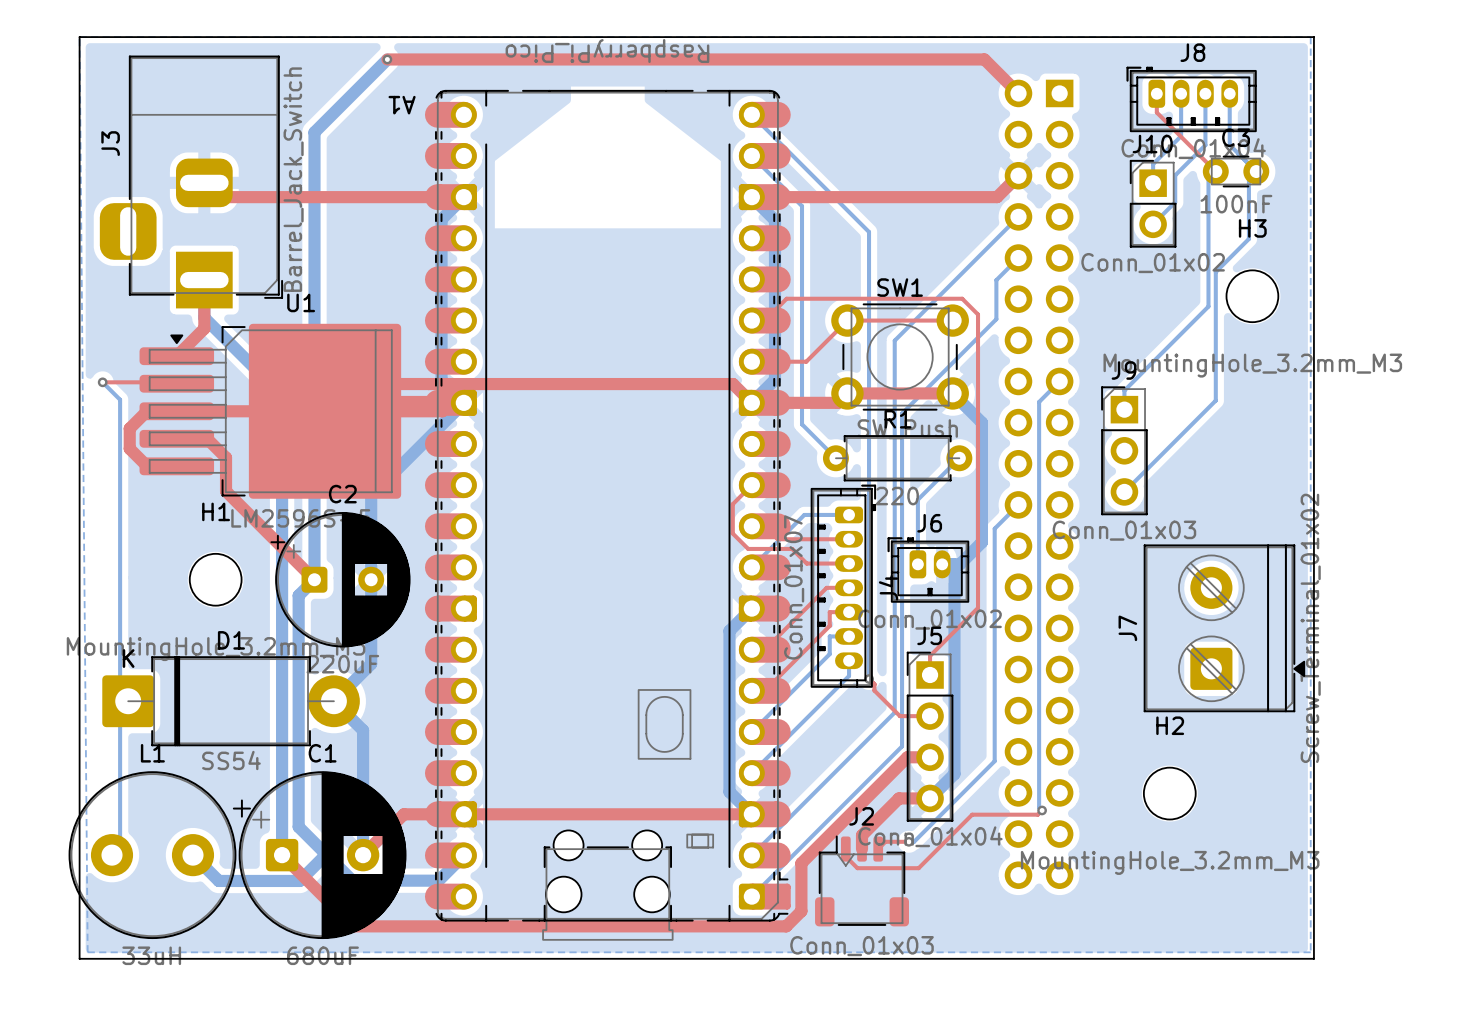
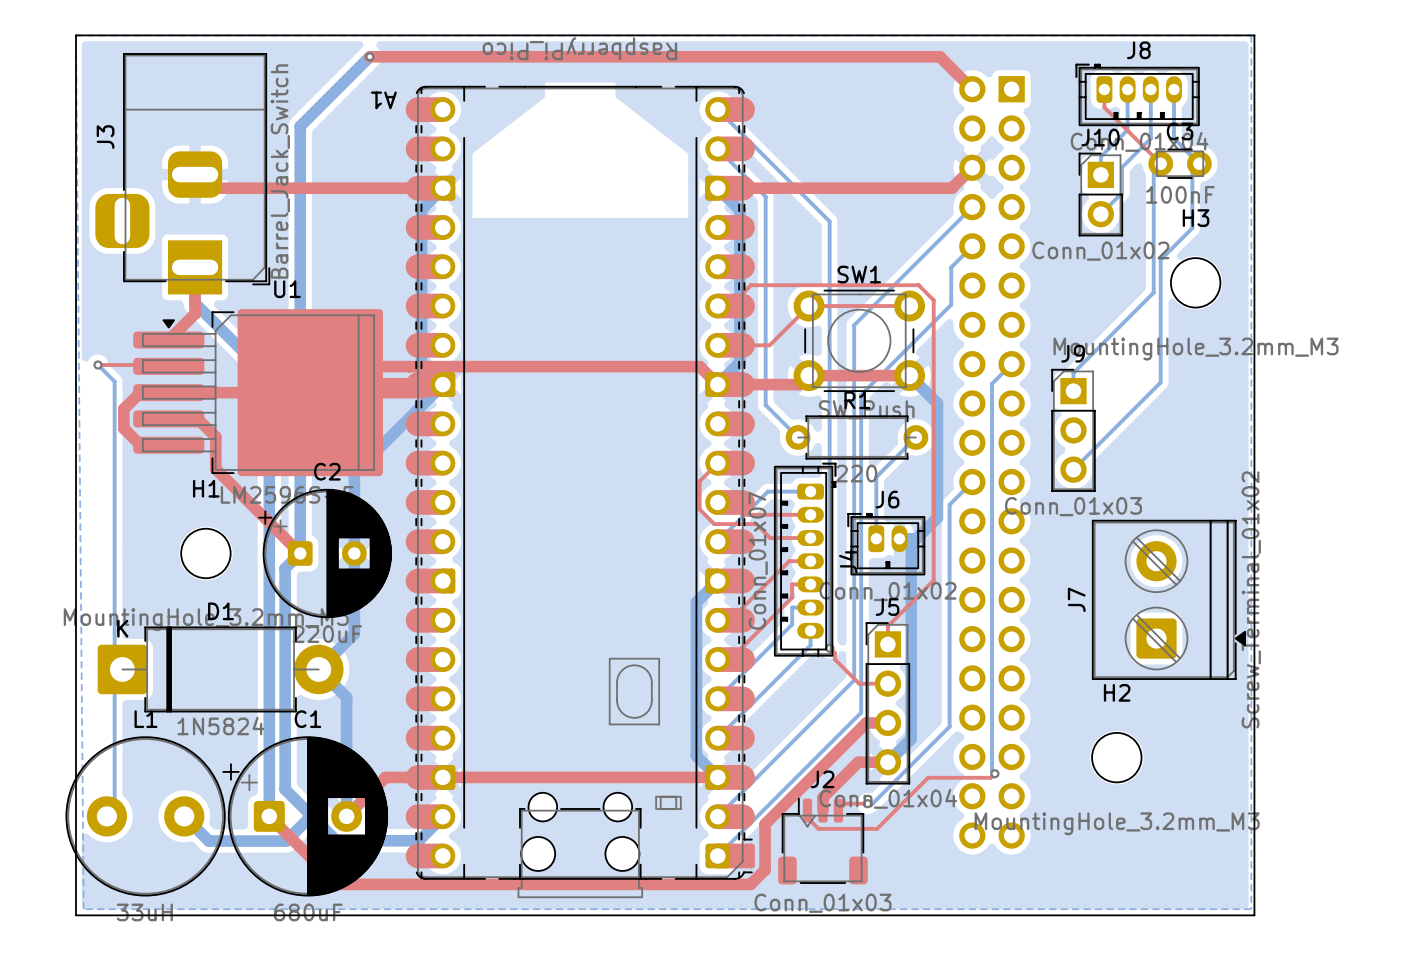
D1 value: SS54 (231, 760) -> 1N5824 (220, 726)

